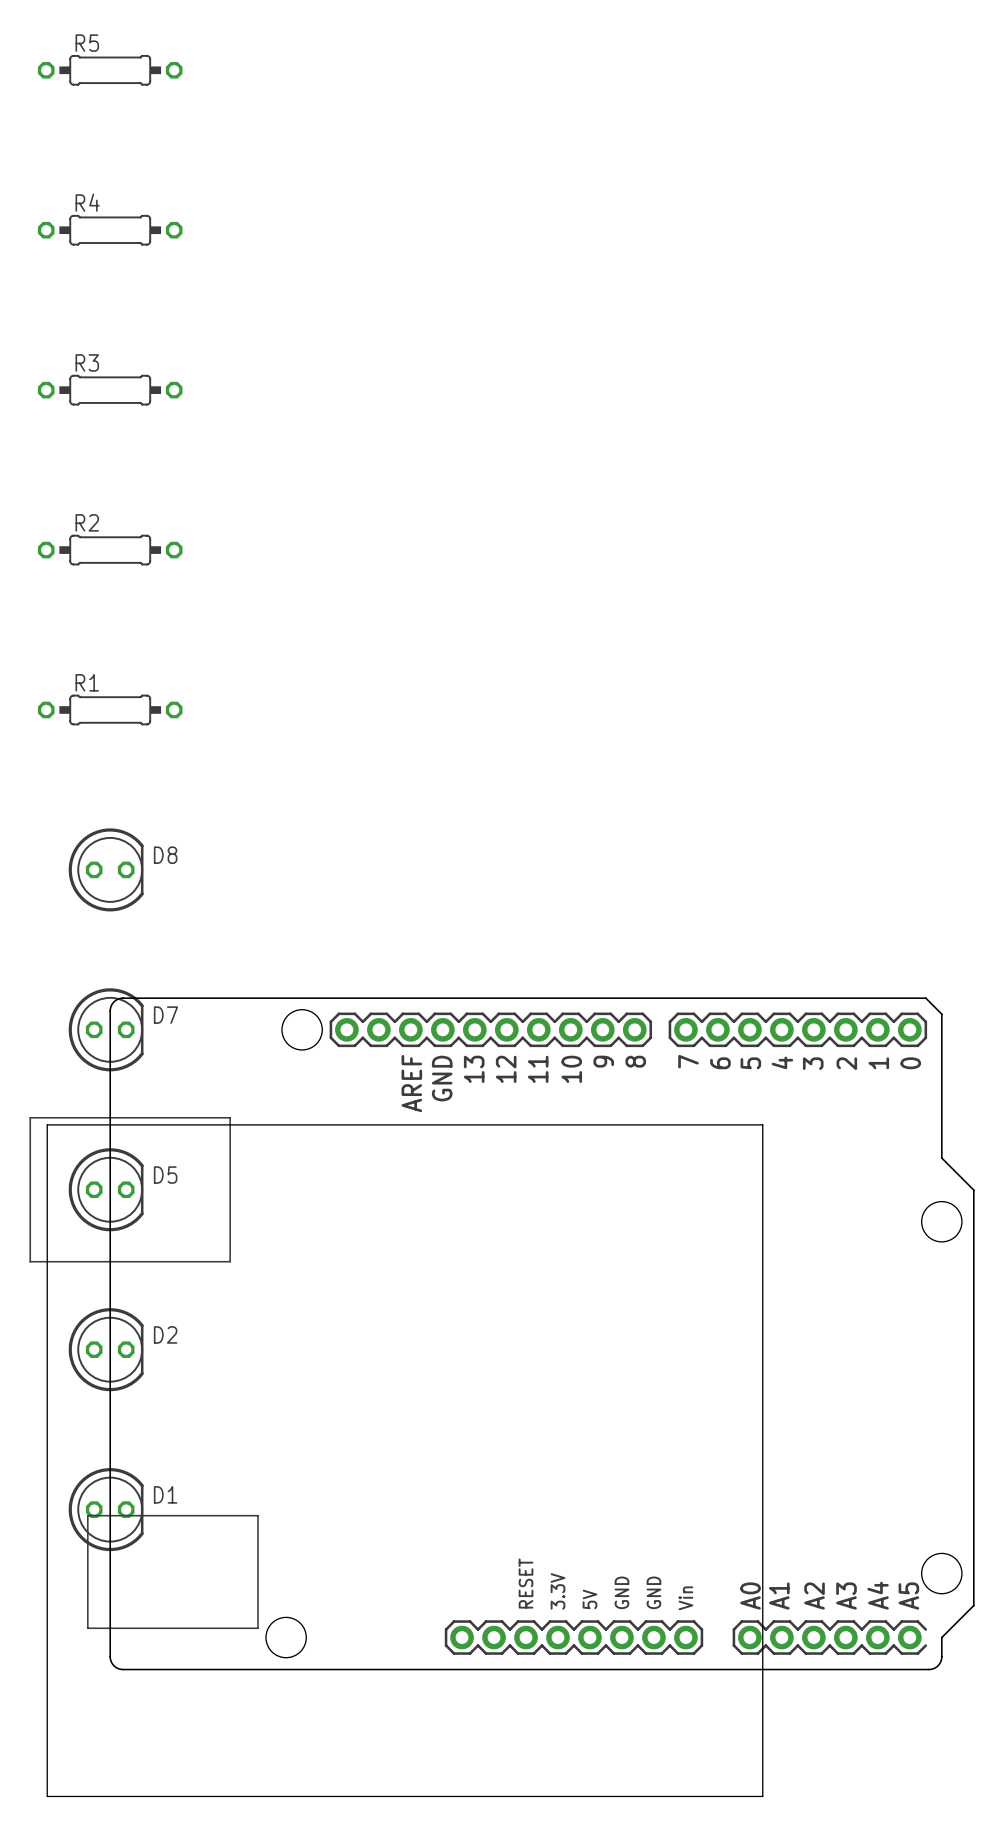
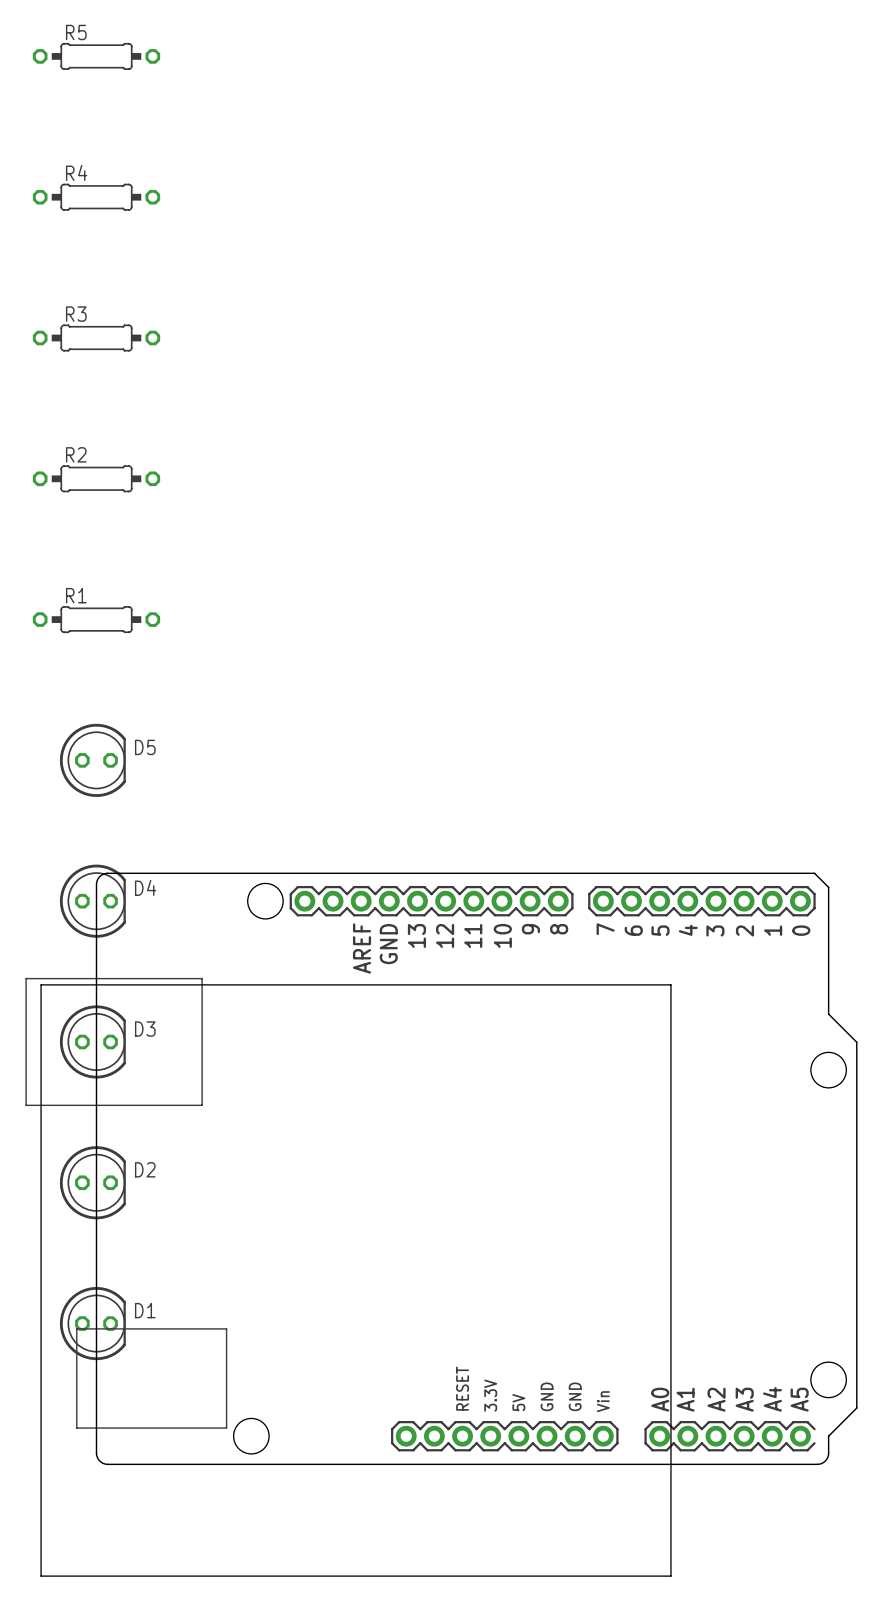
D8 name: D8 (165, 855) -> D5 (145, 747)
D7 name: D7 (165, 1015) -> D4 (145, 887)
D5 name: D5 (165, 1175) -> D3 (145, 1029)

